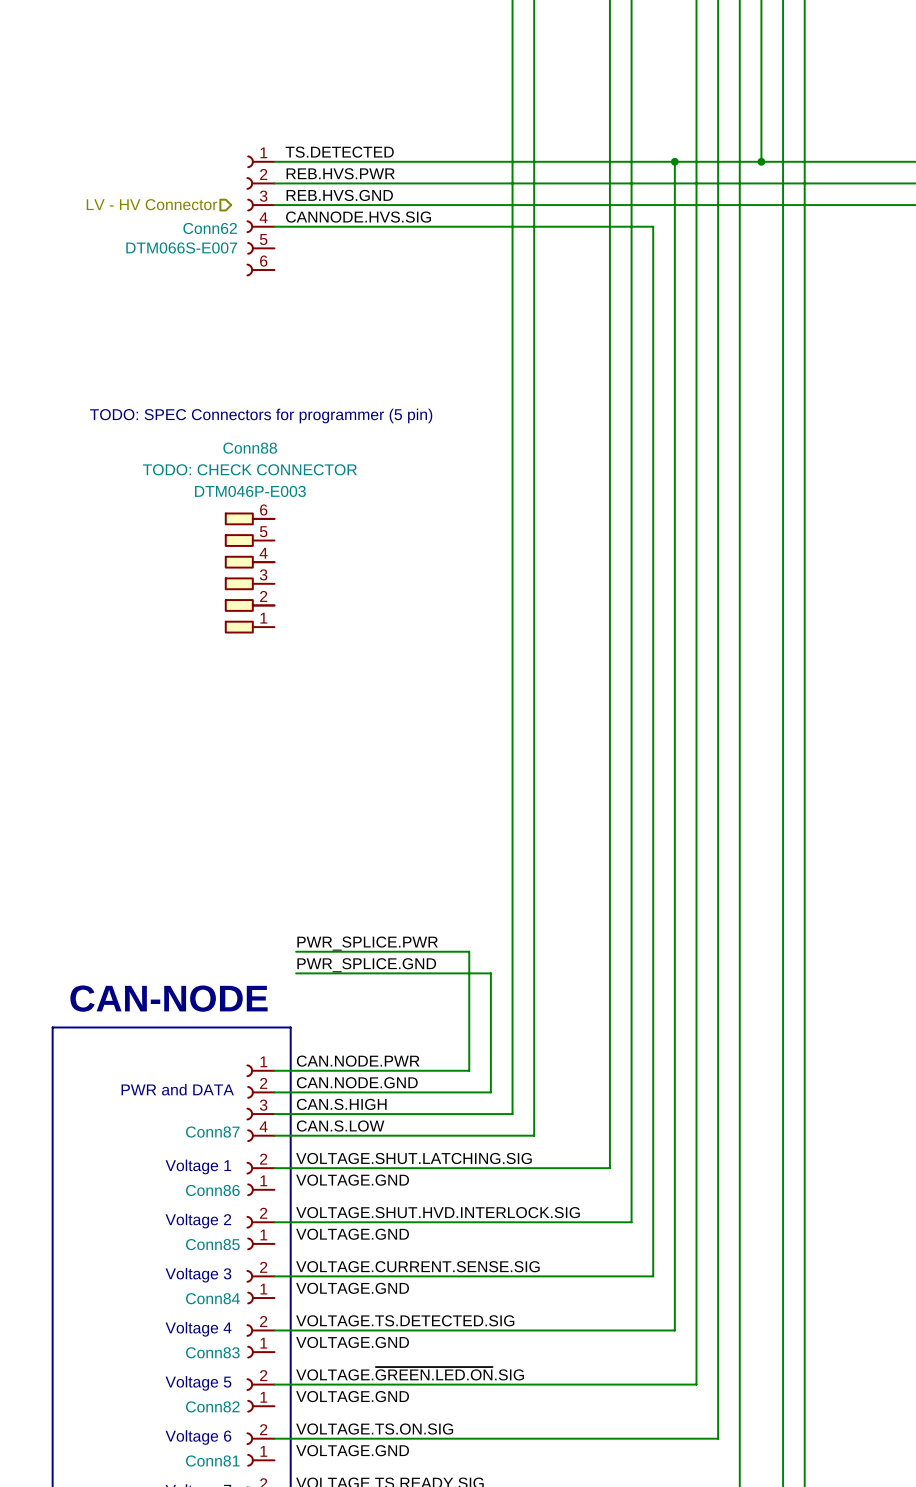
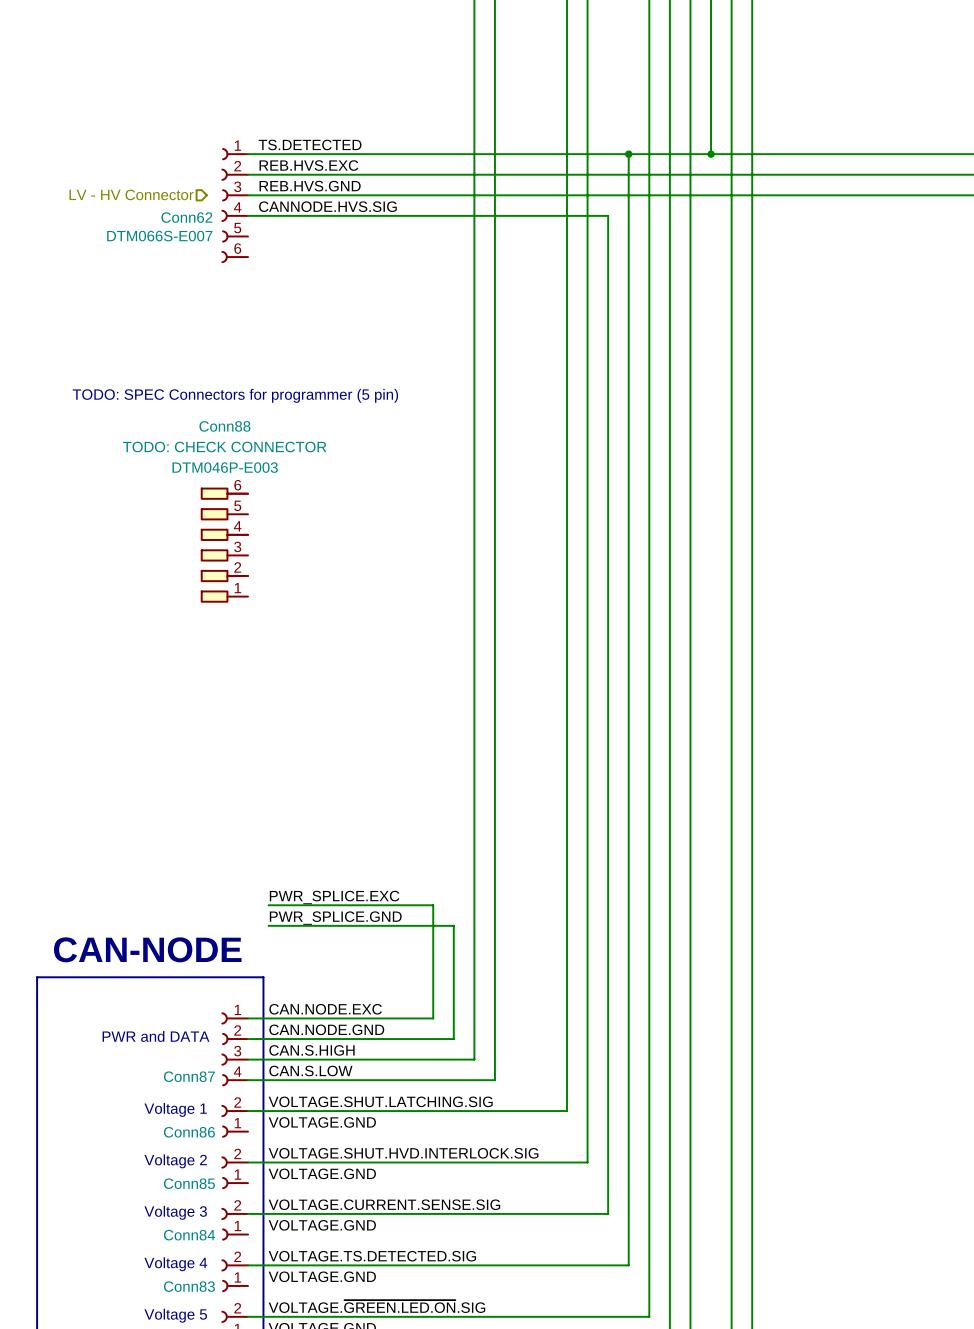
label: REB.HVS.PWR (340, 173) -> REB.HVS.EXC (308, 165)
label: PWR_SPLICE.PWR (367, 943) -> PWR_SPLICE.EXC (334, 897)
label: CAN.NODE.PWR (358, 1061) -> CAN.NODE.EXC (325, 1009)

